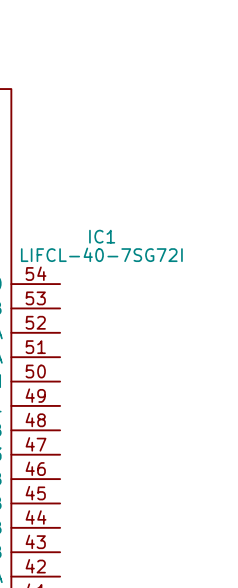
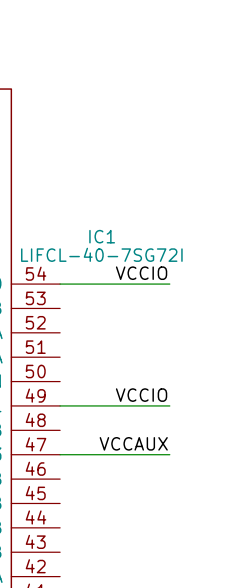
label: none -> VCCIO (141, 273)
wire: none -> (60, 284) (169, 284)
label: none -> VCCIO (141, 395)
wire: none -> (60, 405) (169, 405)
label: none -> VCCAUX (133, 443)
wire: none -> (60, 454) (169, 454)

